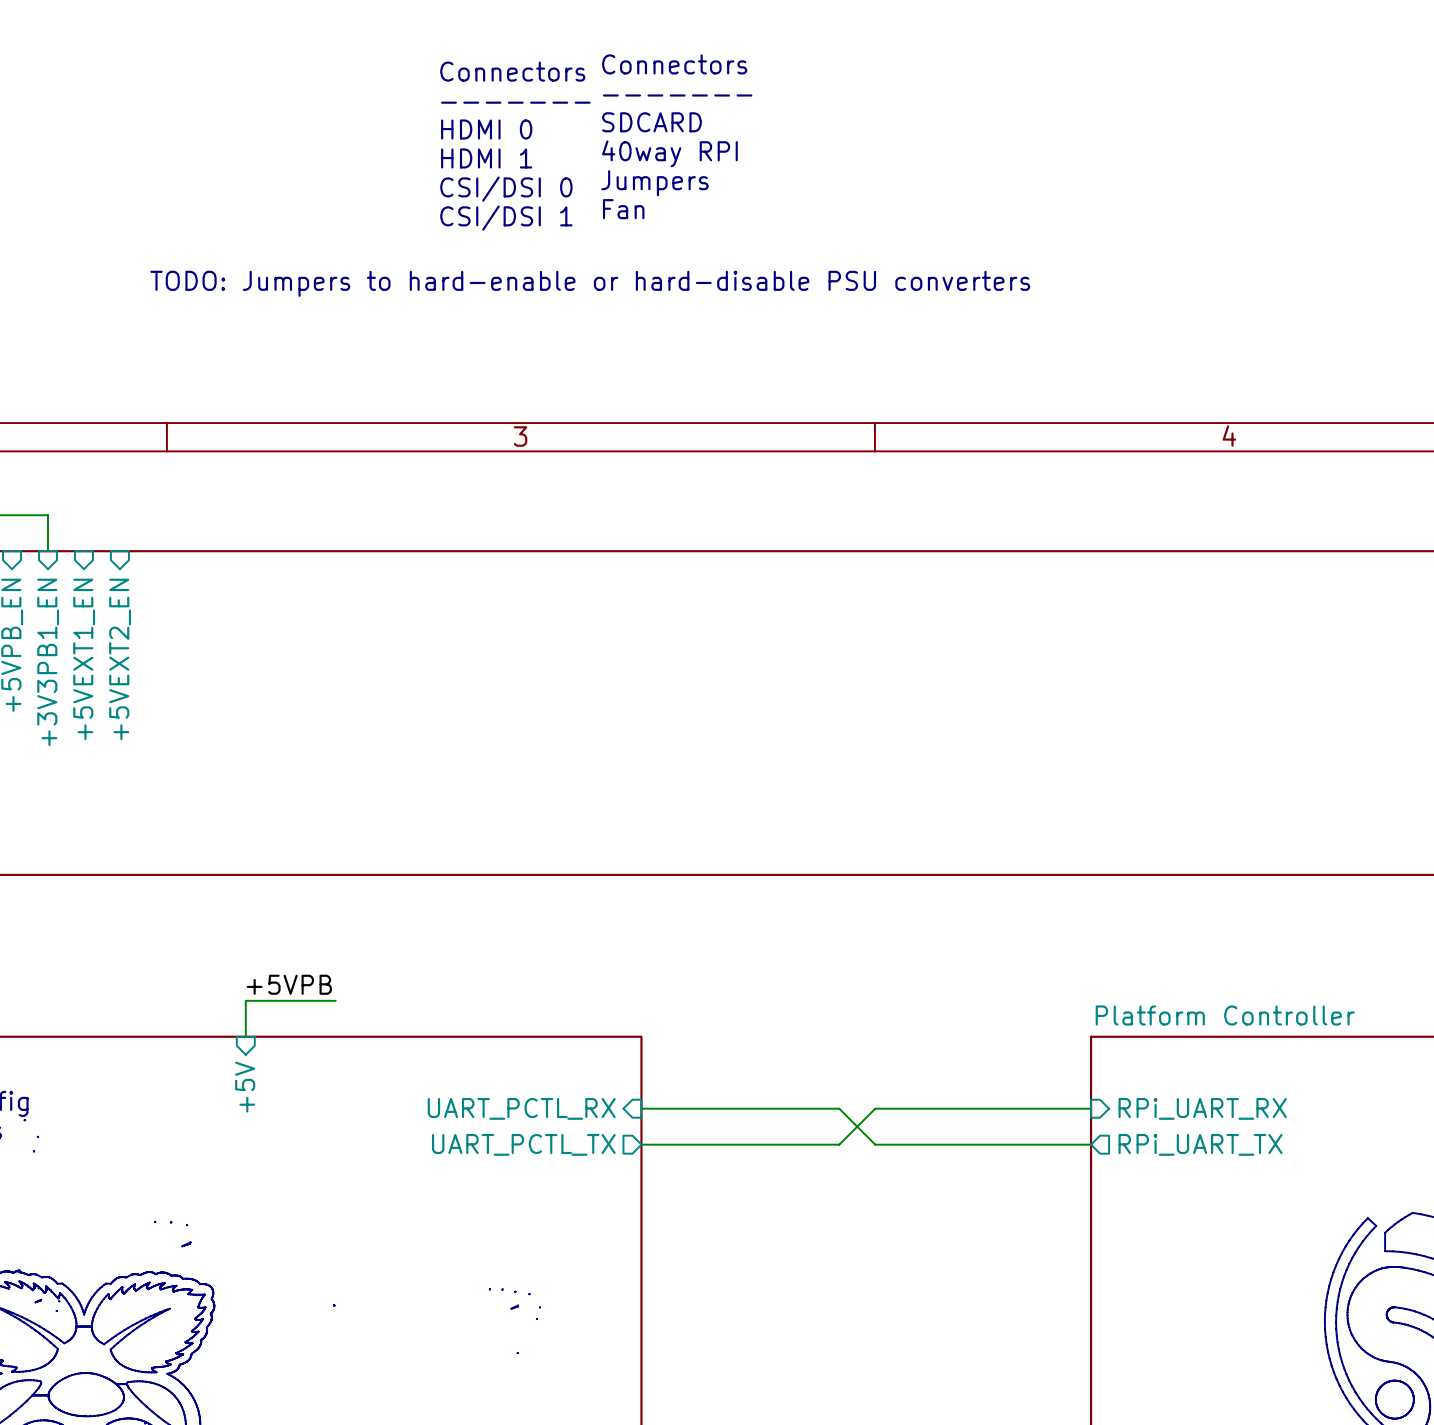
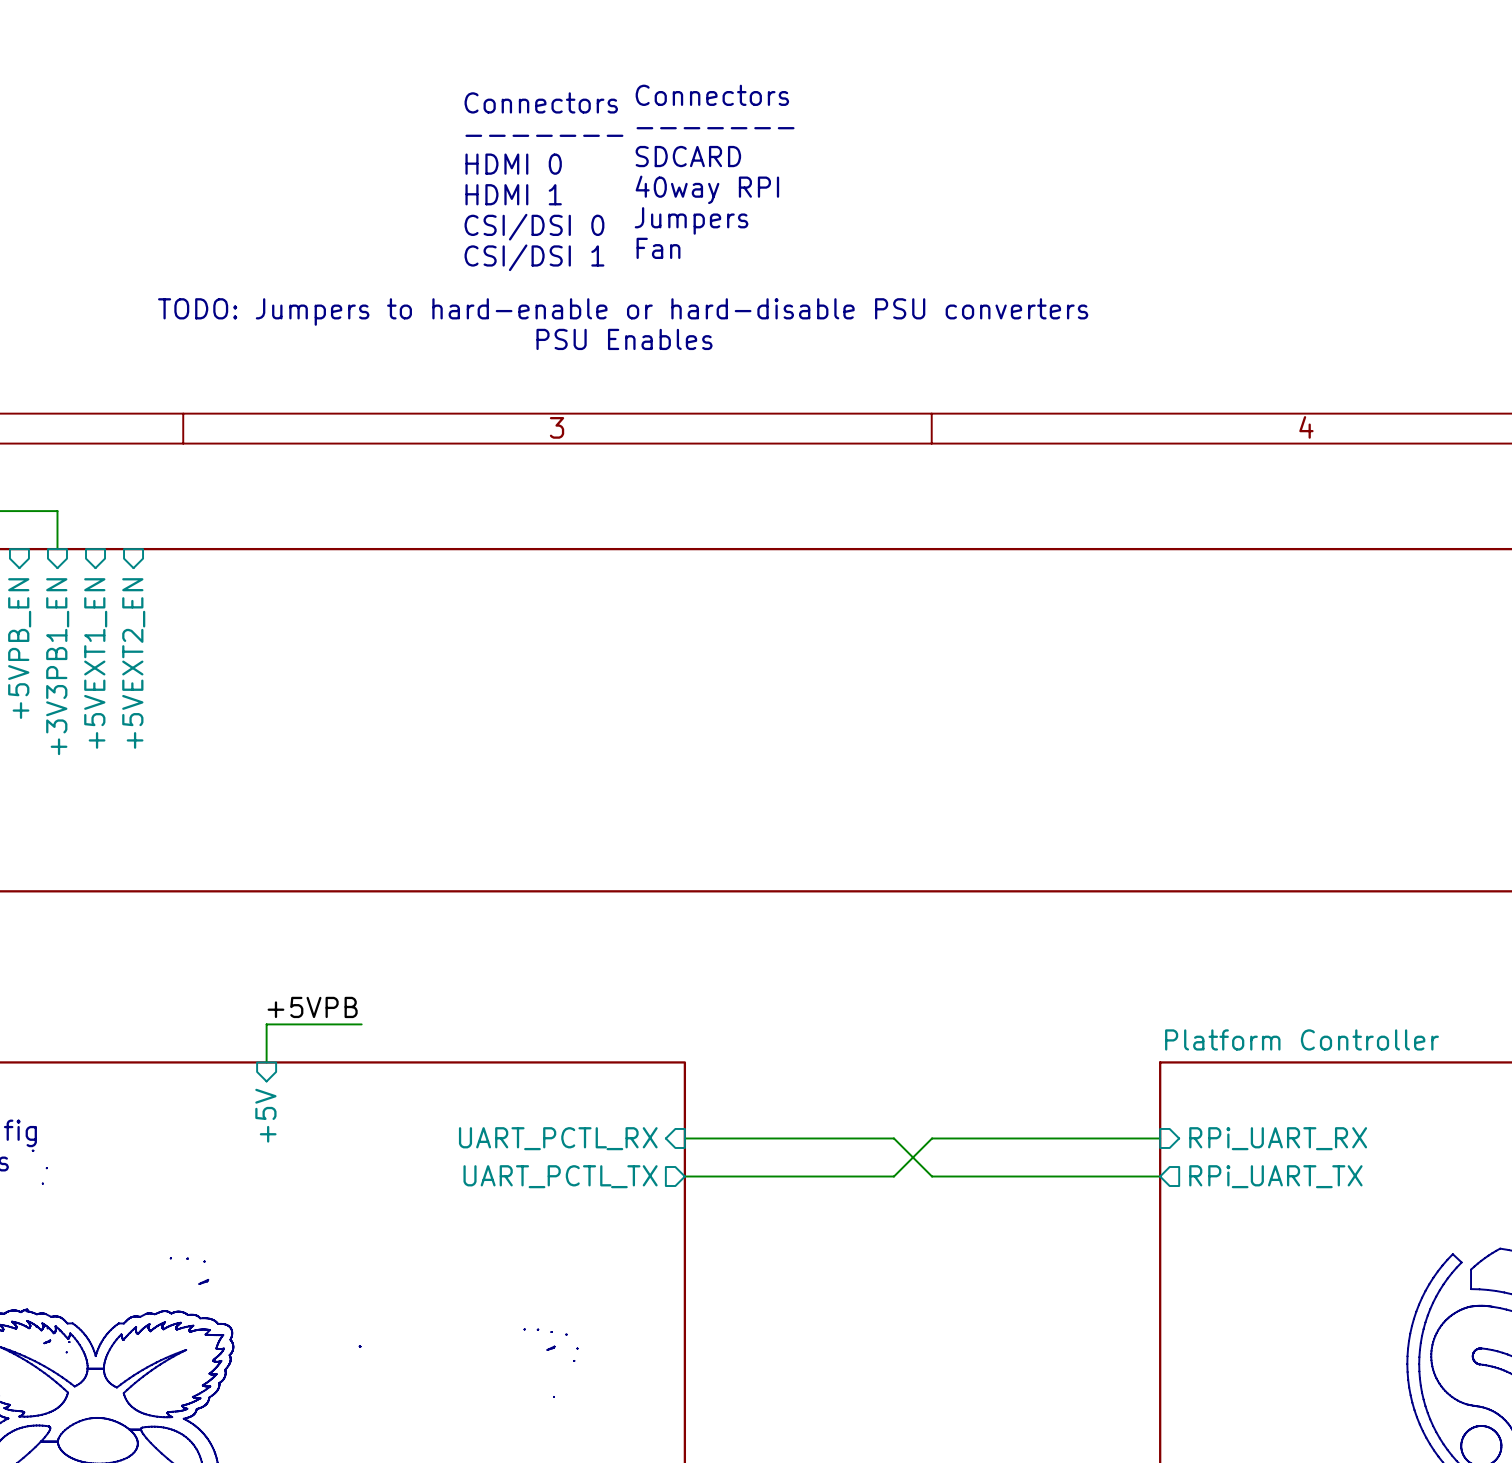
text position: Connectors (674, 64) -> Connectors (712, 95)
text position: Connectors (512, 71) -> Connectors (541, 102)
text position: ------- (677, 95) -> ------- (715, 128)
text position: ------- (515, 102) -> ------- (544, 135)
text position: SDCARD (651, 122) -> SDCARD (688, 156)
text position: HDMI 0 (486, 129) -> HDMI 0 (513, 164)
text position: 40way RPI (669, 153) -> 40way RPI (707, 189)
text position: HDMI 1 (486, 158) -> HDMI 1 (513, 194)
text position: Jumpers (654, 183) -> Jumpers (691, 220)
text position: CSI/DSI 0 (506, 189) -> CSI/DSI 0 (534, 227)
text position: Fan (623, 209) -> Fan (658, 248)
text position: CSI/DSI 1 (506, 218) -> CSI/DSI 1 (534, 257)
text position: TODO: Jumpers to hard-enable or hard-disable PSU converters (590, 283) -> TODO: Jumpers to hard-enable or hard-disable PSU converters (623, 311)
text: none -> PSU Enables (624, 339)

